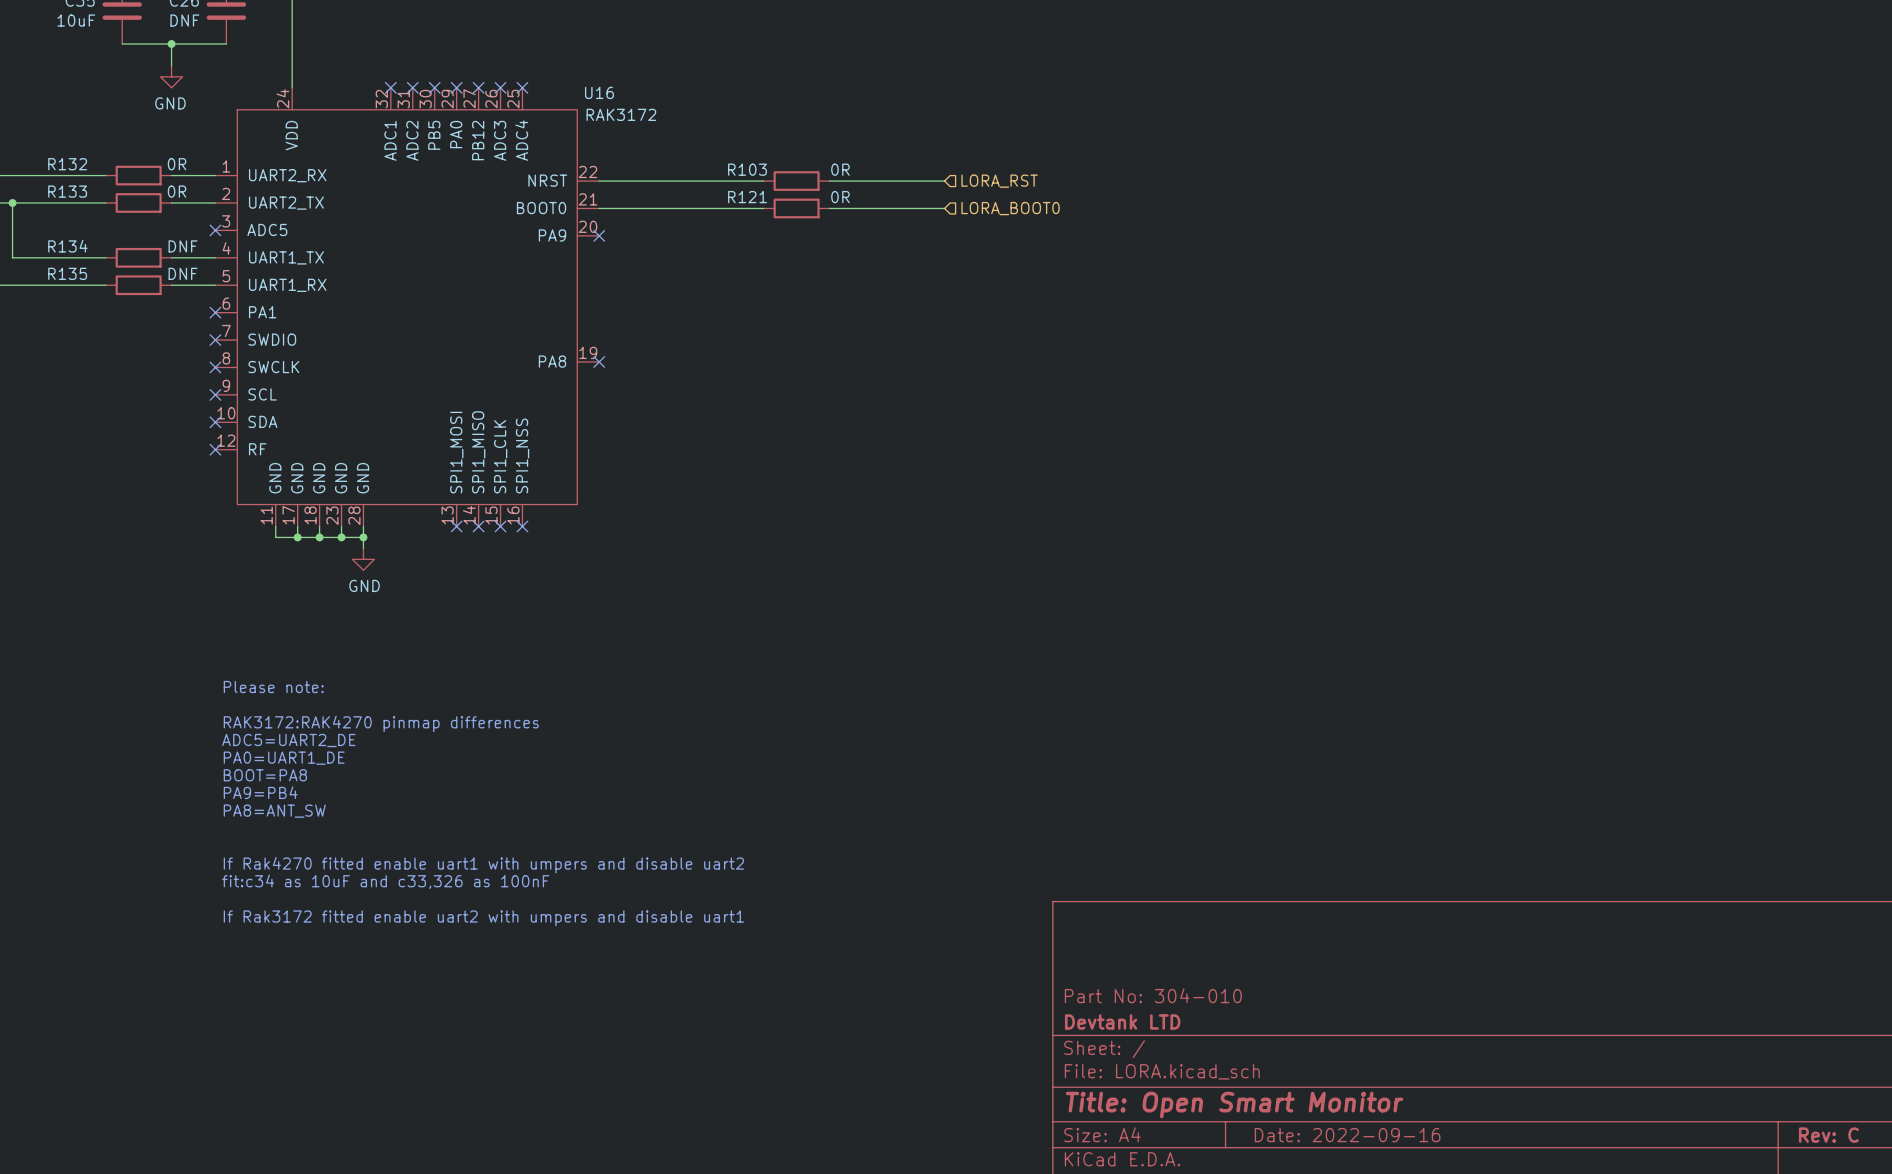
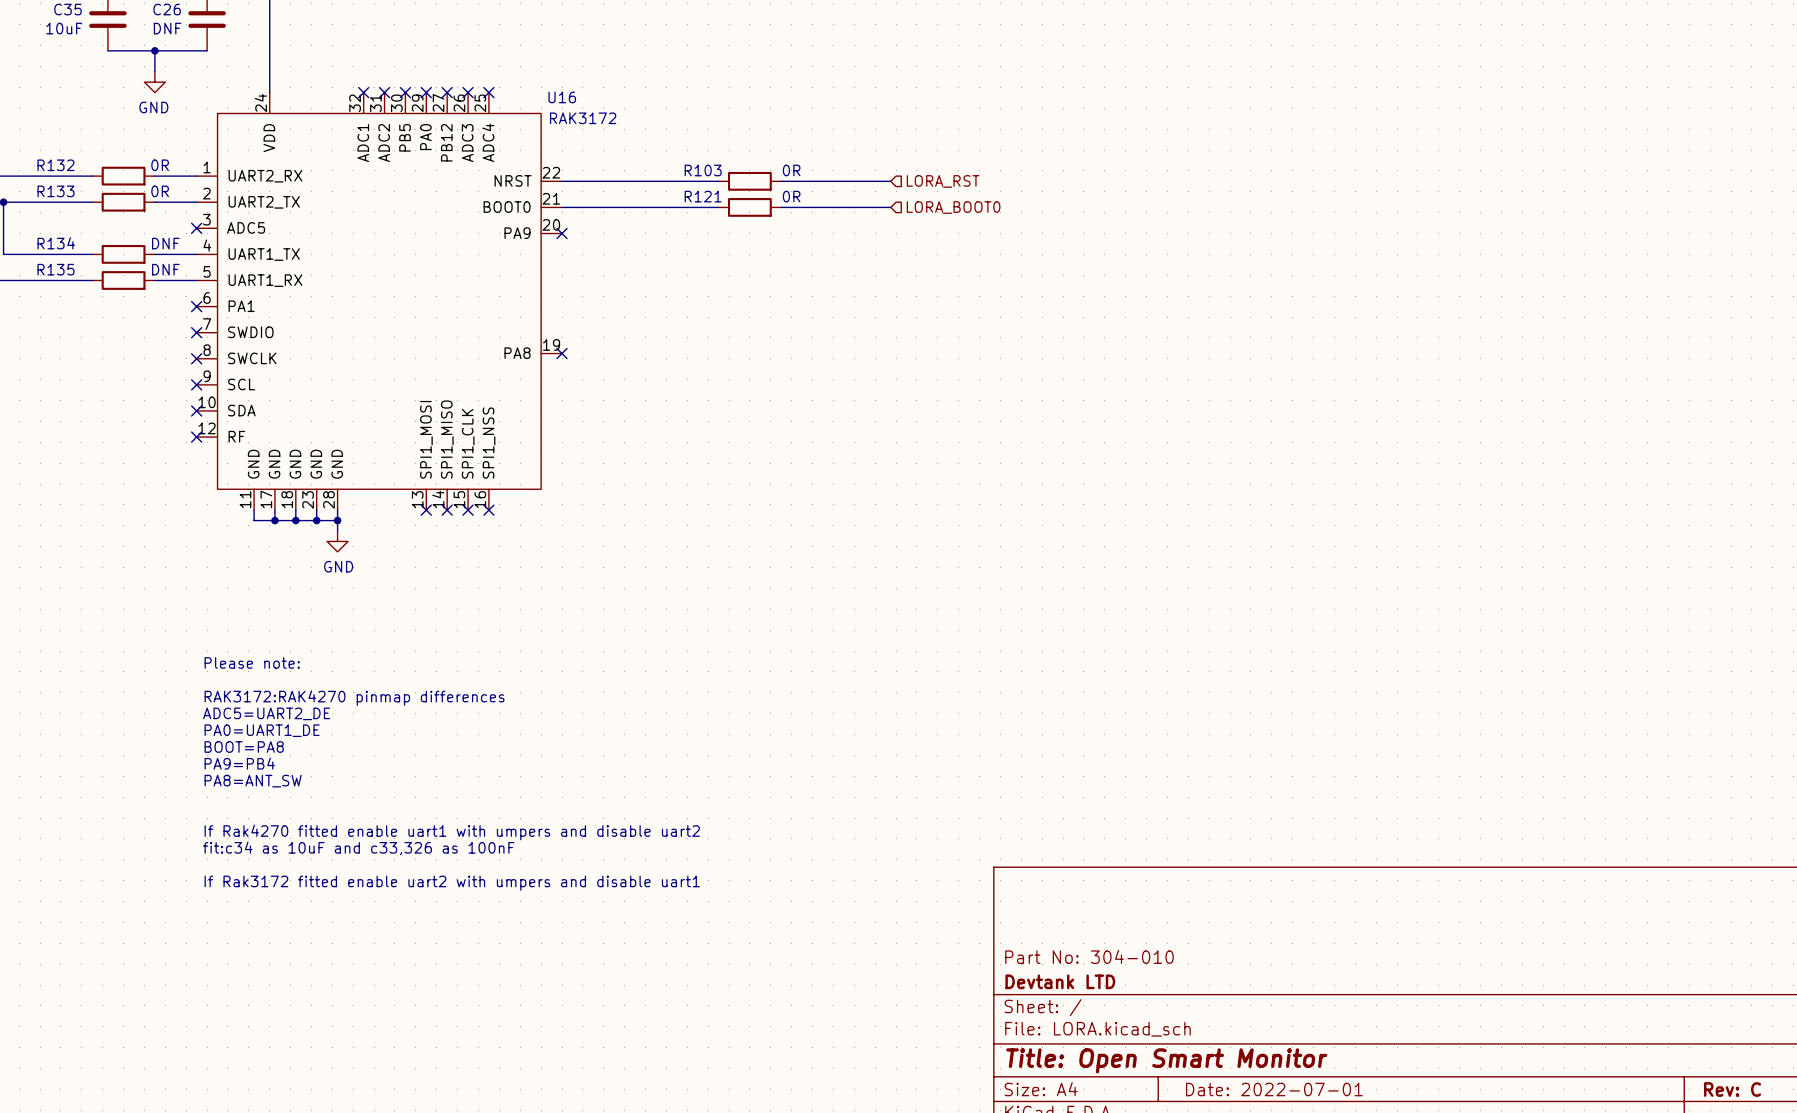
title block: Date: 2022-09-16 (1347, 1135) -> Date: 2022-07-01 (1274, 1089)

